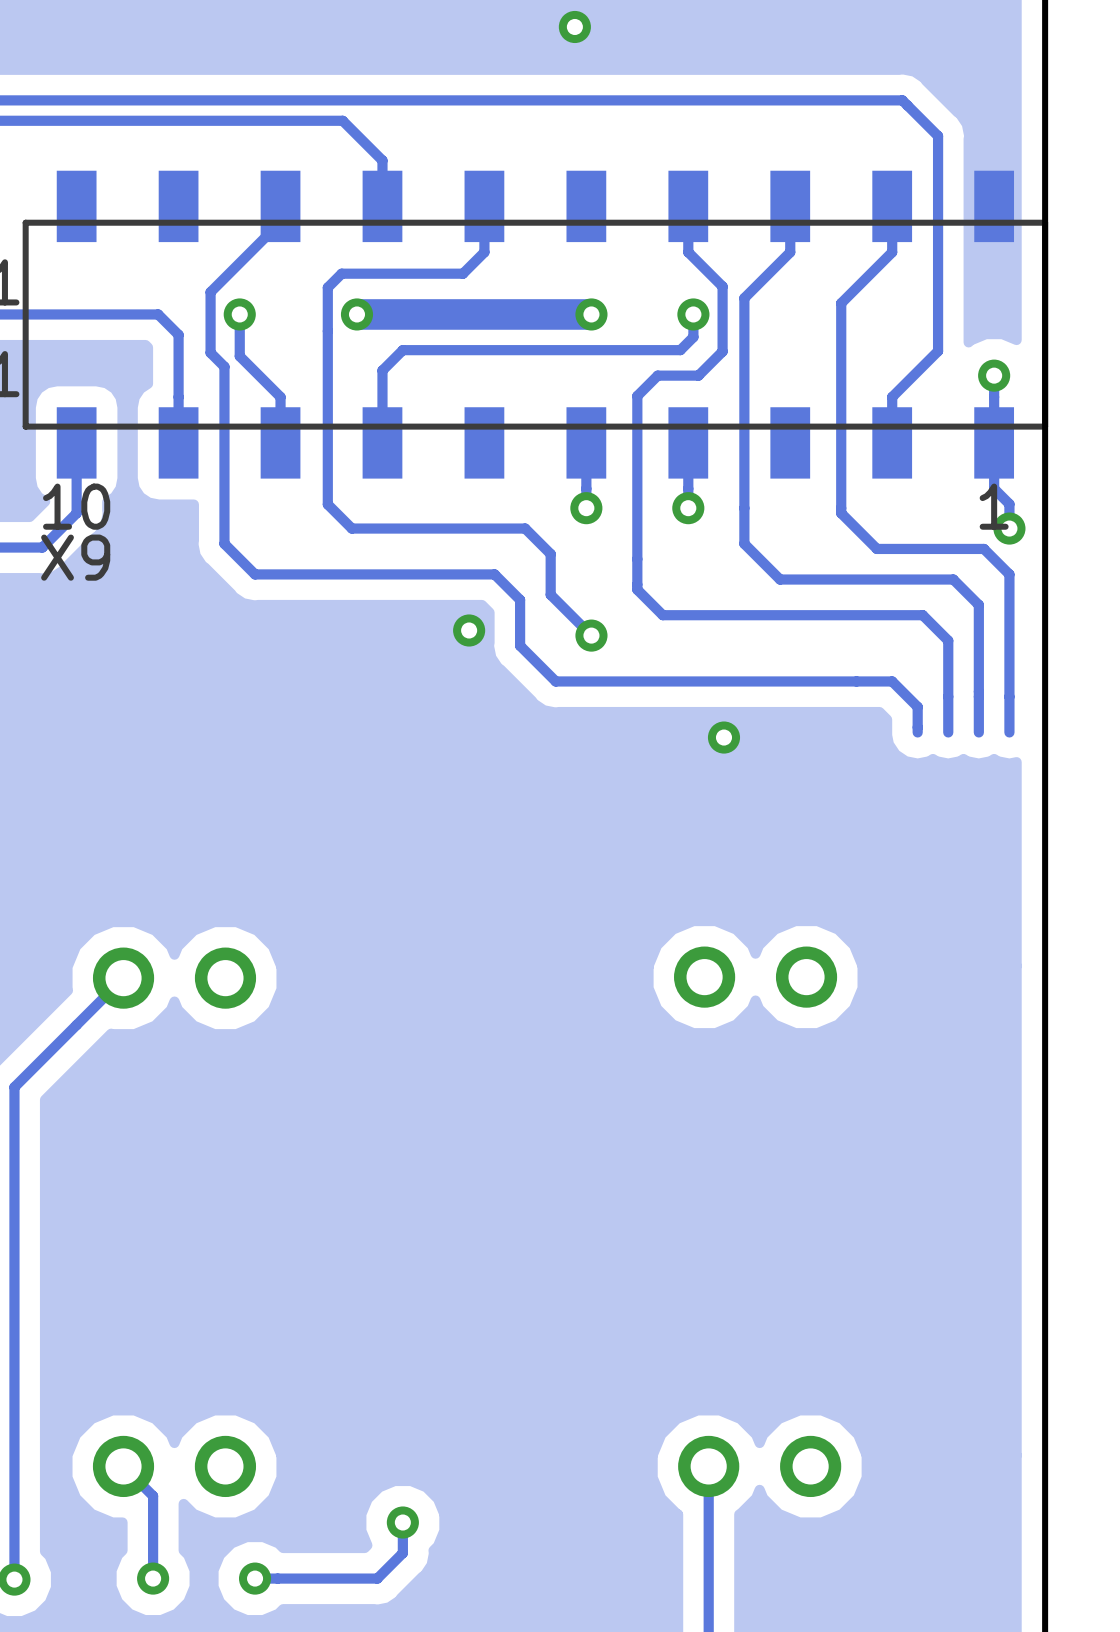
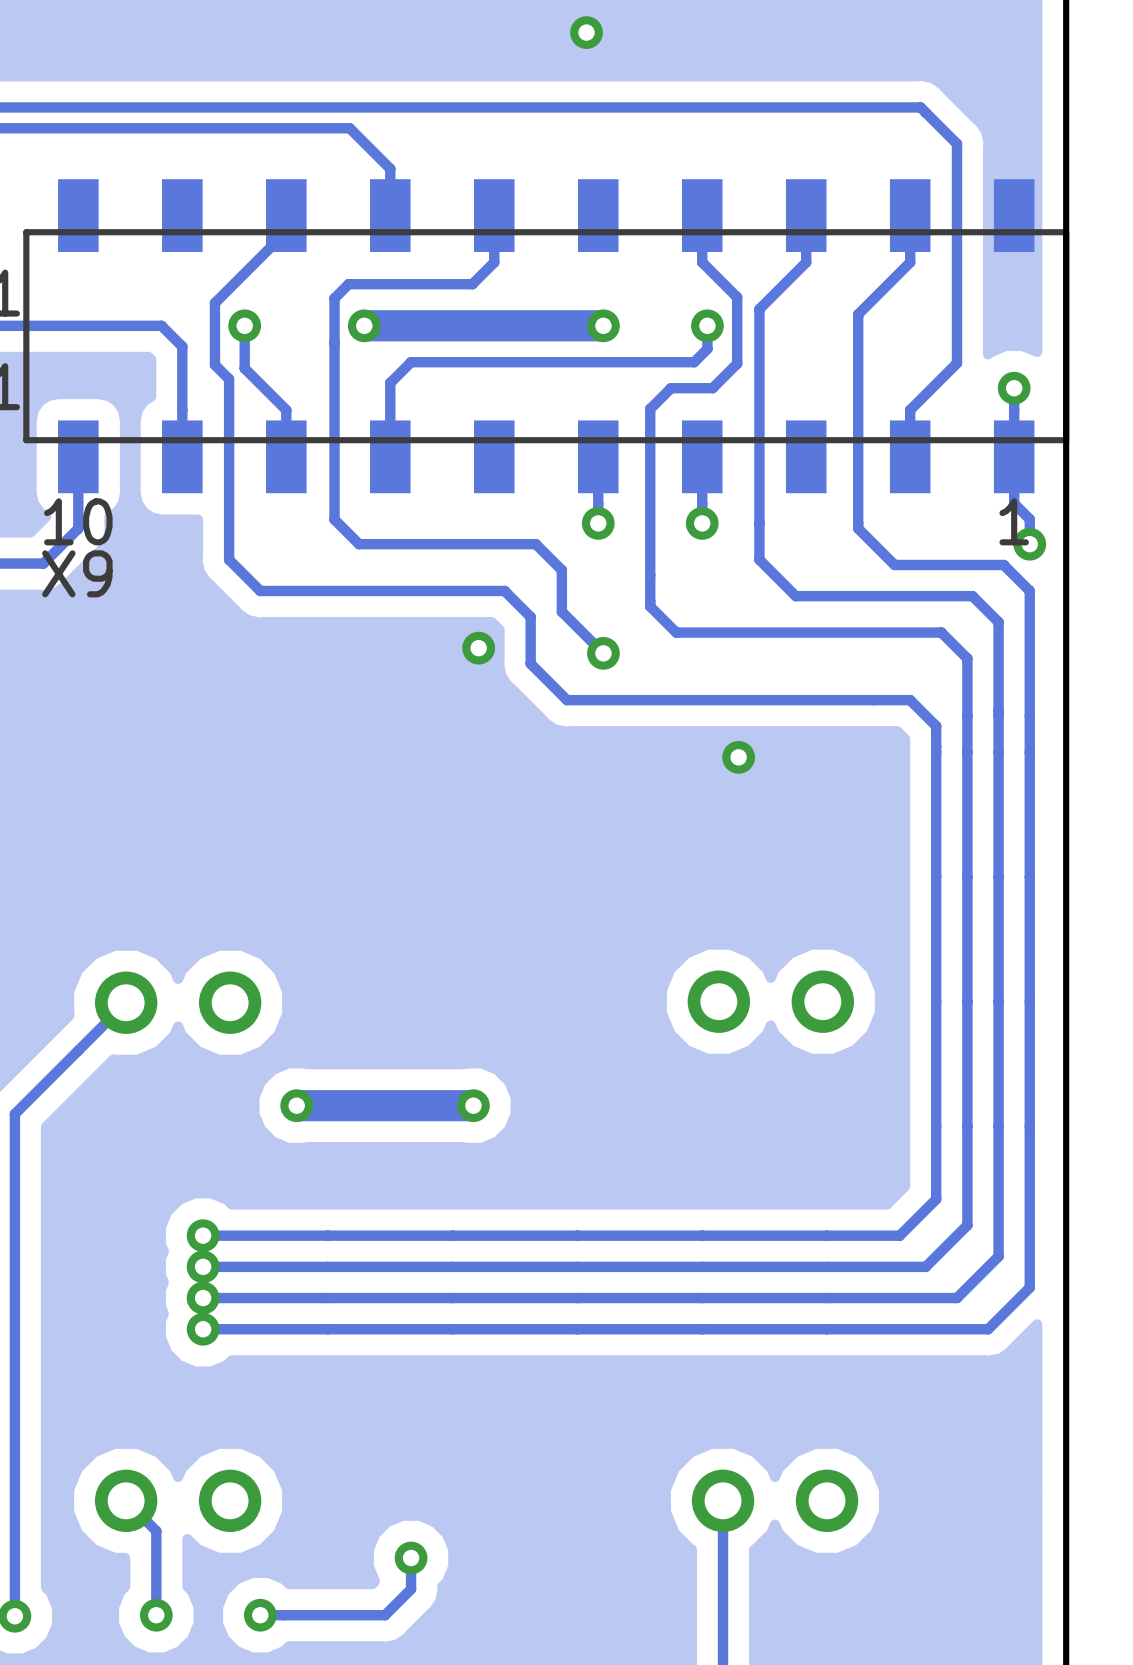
track: none -> (936, 752) (936, 1199) (899, 1235) (203, 1235)
track: none -> (967, 752) (967, 1225) (925, 1266) (203, 1266)
track: none -> (998, 752) (998, 1256) (956, 1298) (203, 1298)
track: none -> (1029, 752) (1029, 1287) (988, 1329) (203, 1329)
via: none -> (296, 1105)
track: none -> (473, 1105) (296, 1105)
via: none -> (473, 1105)
via: none -> (203, 1235)
via: none -> (203, 1266)
via: none -> (203, 1298)
via: none -> (203, 1329)

